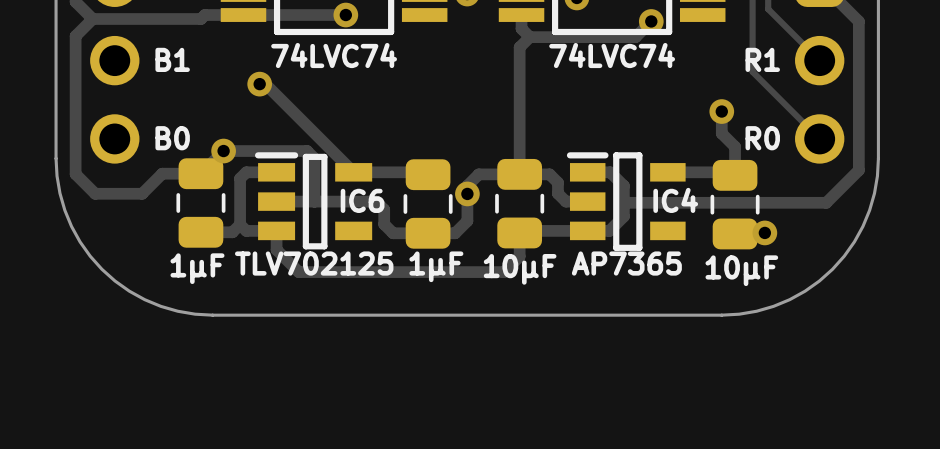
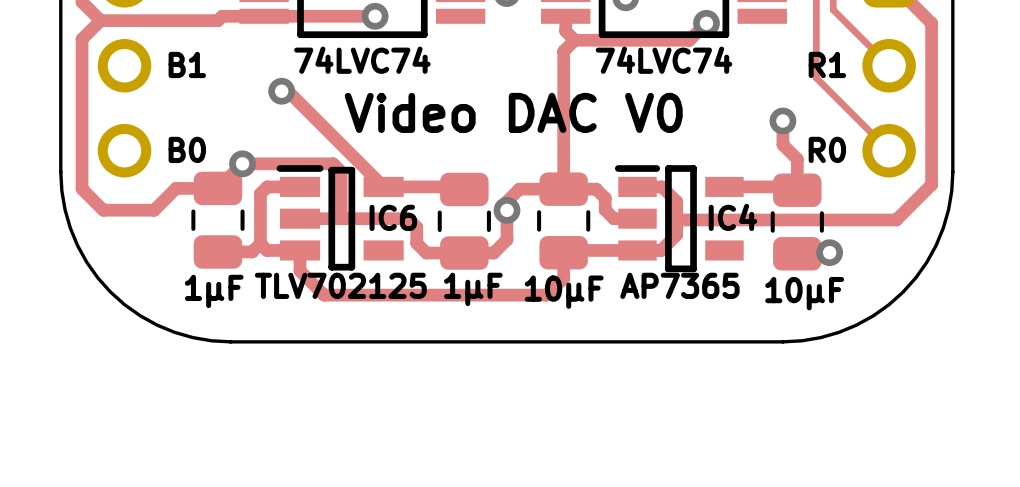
text: none -> Video DAC V0 (513, 112)

